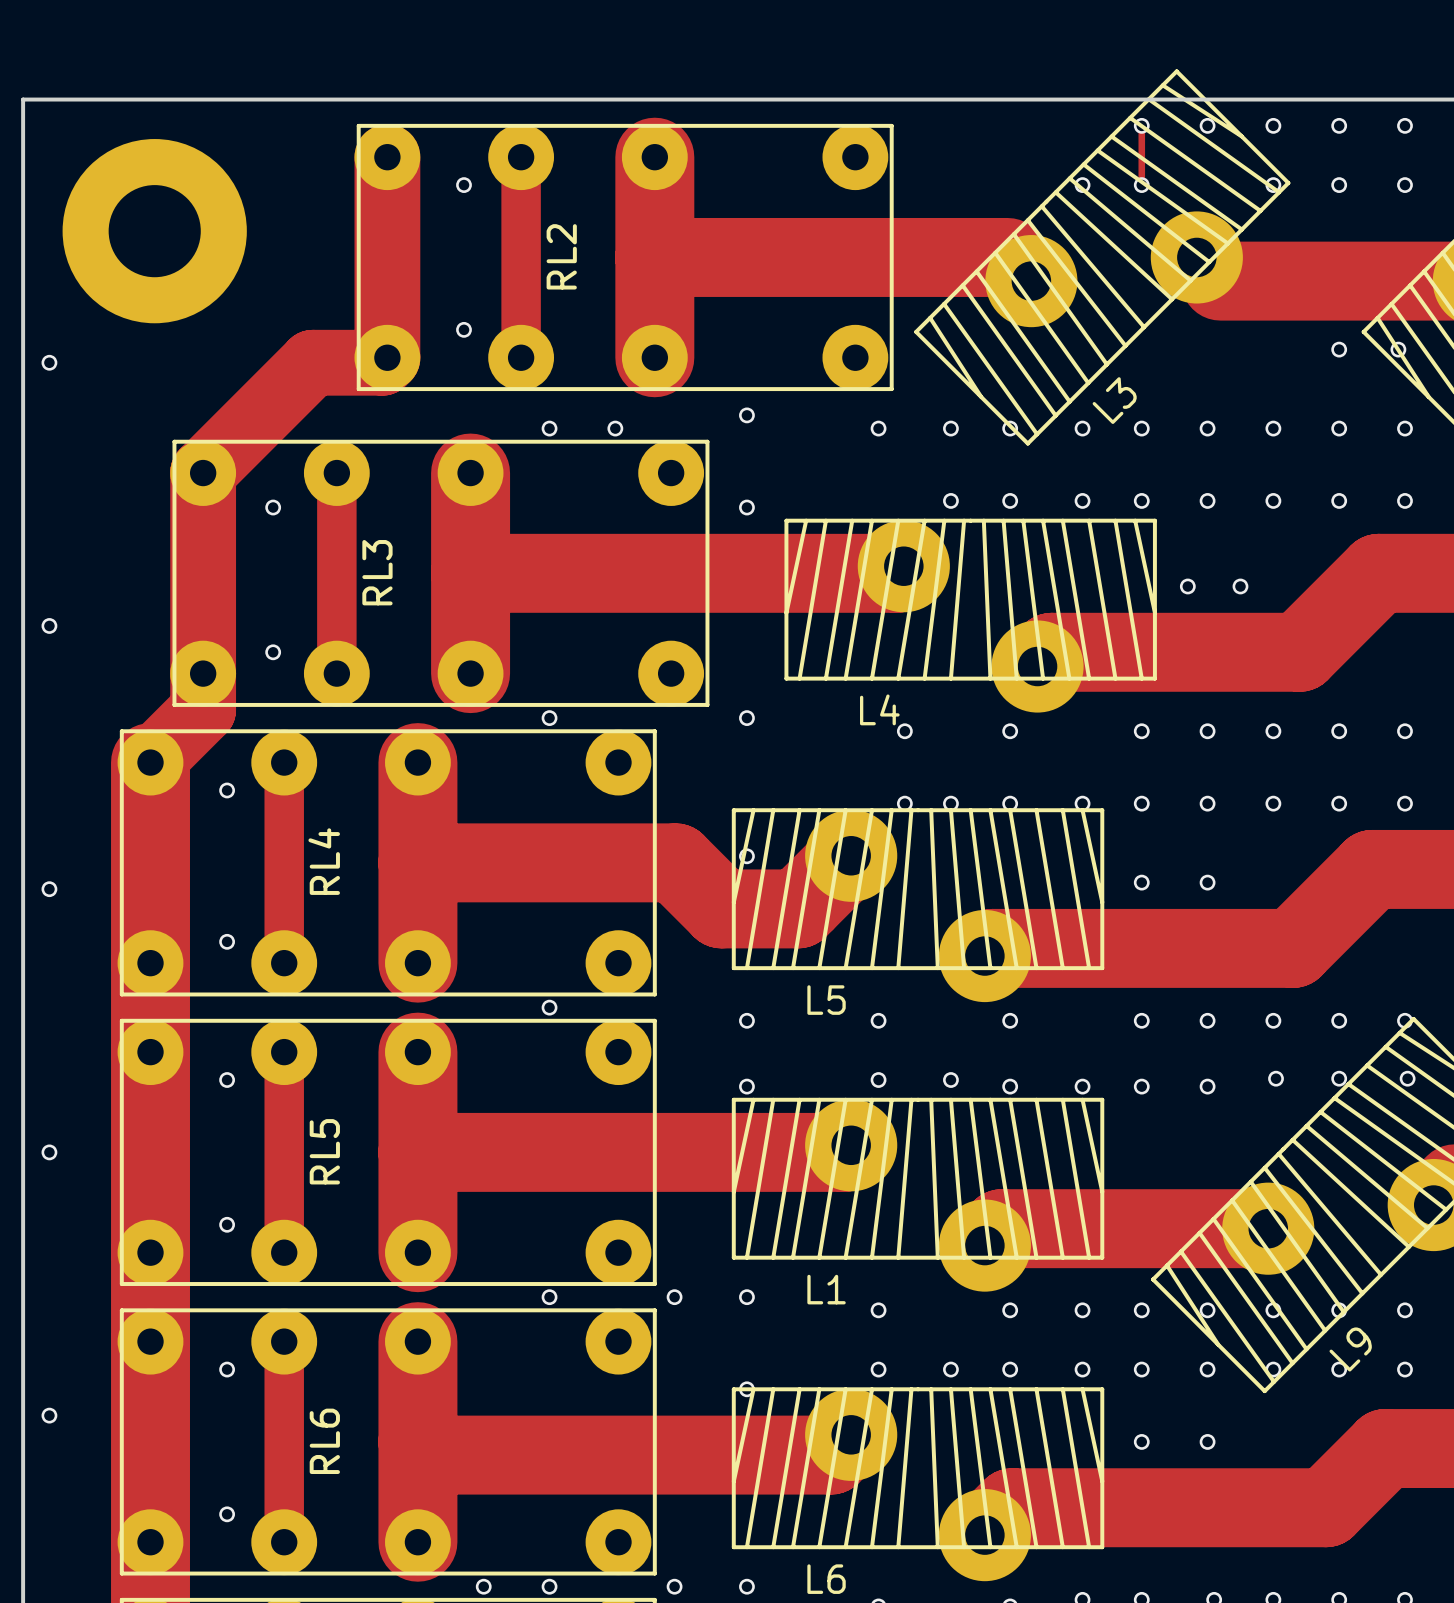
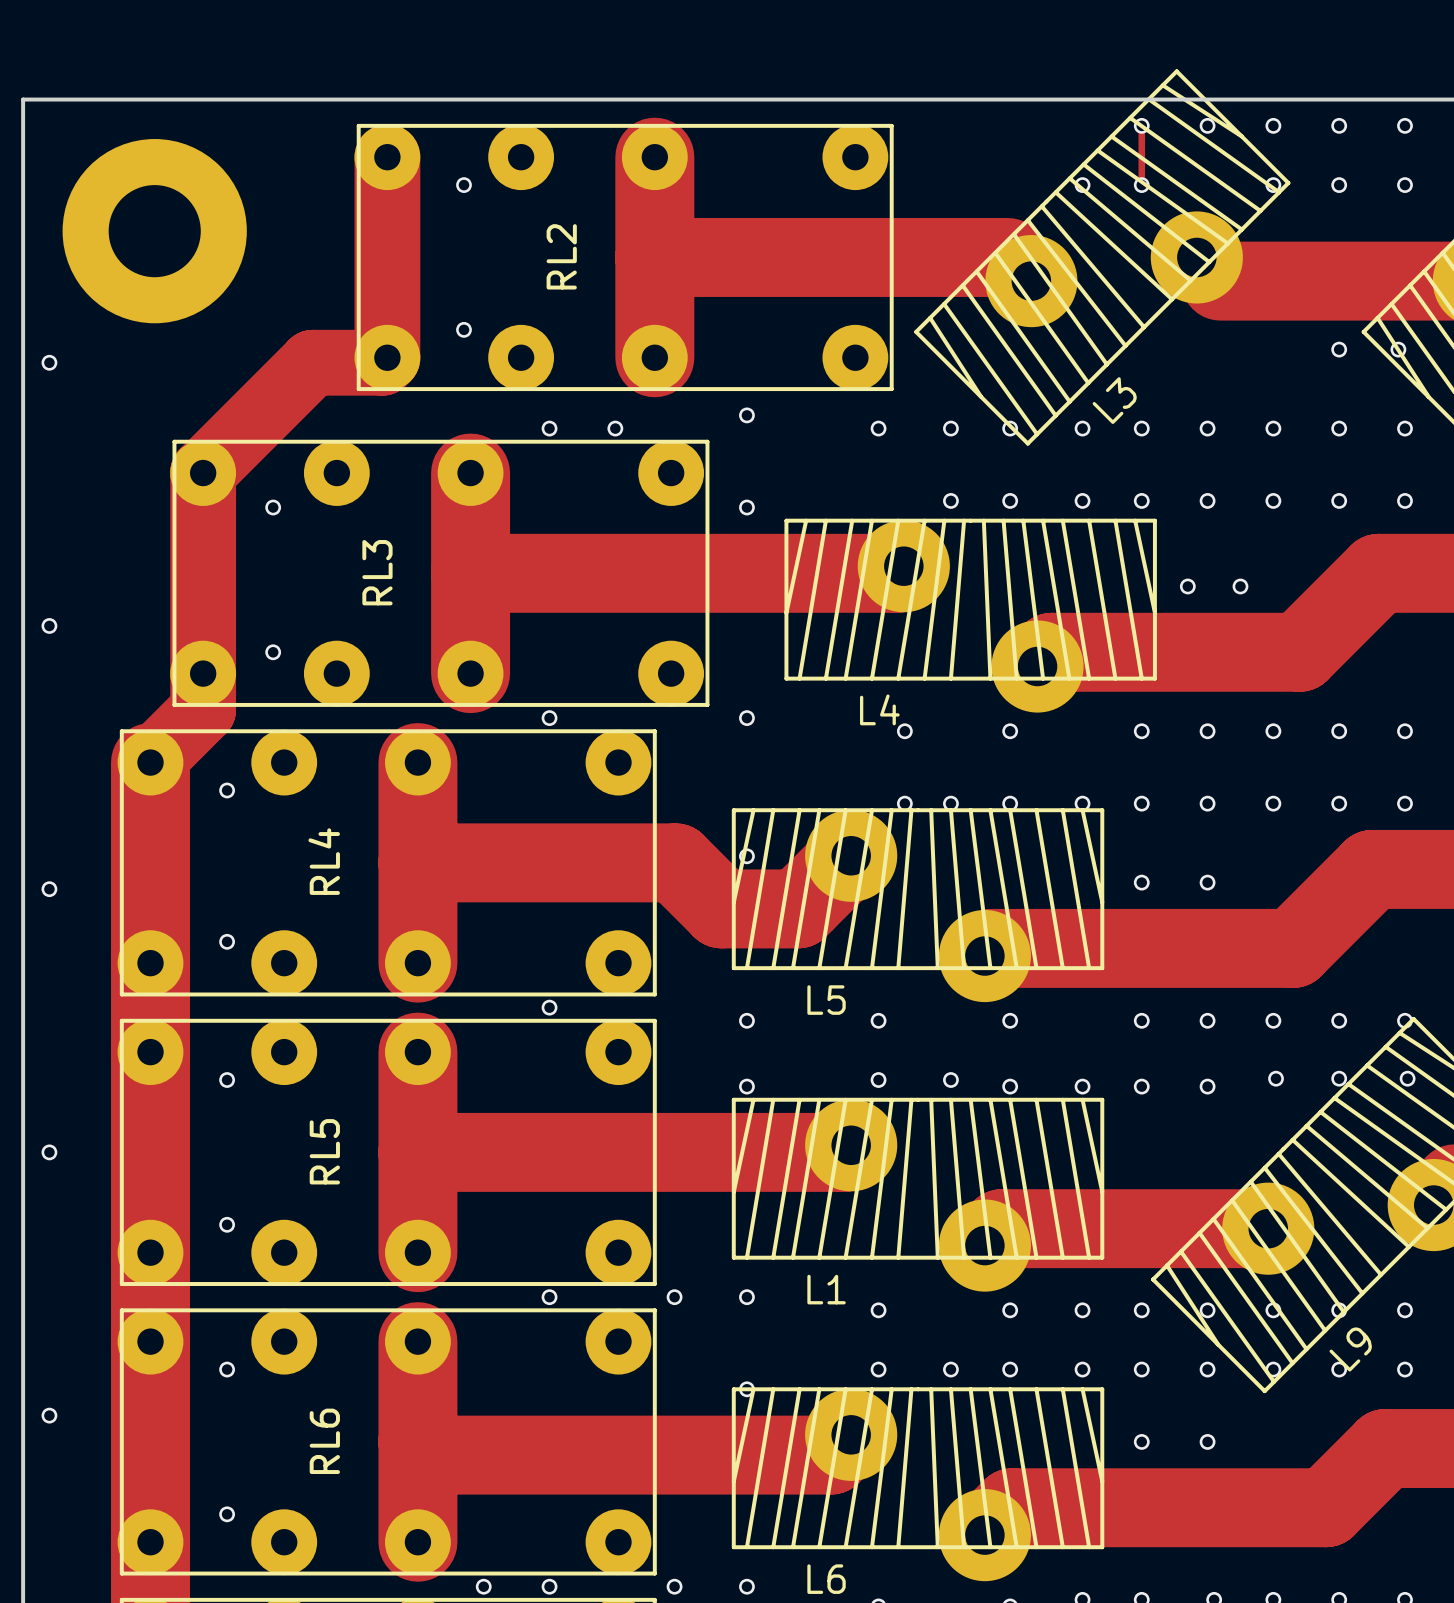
track: (521, 157) (521, 357) -> none
track: (336, 473) (336, 673) -> none
track: (284, 762) (284, 963) -> none
track: (284, 1052) (284, 1252) -> none
track: (284, 1341) (284, 1542) -> none

